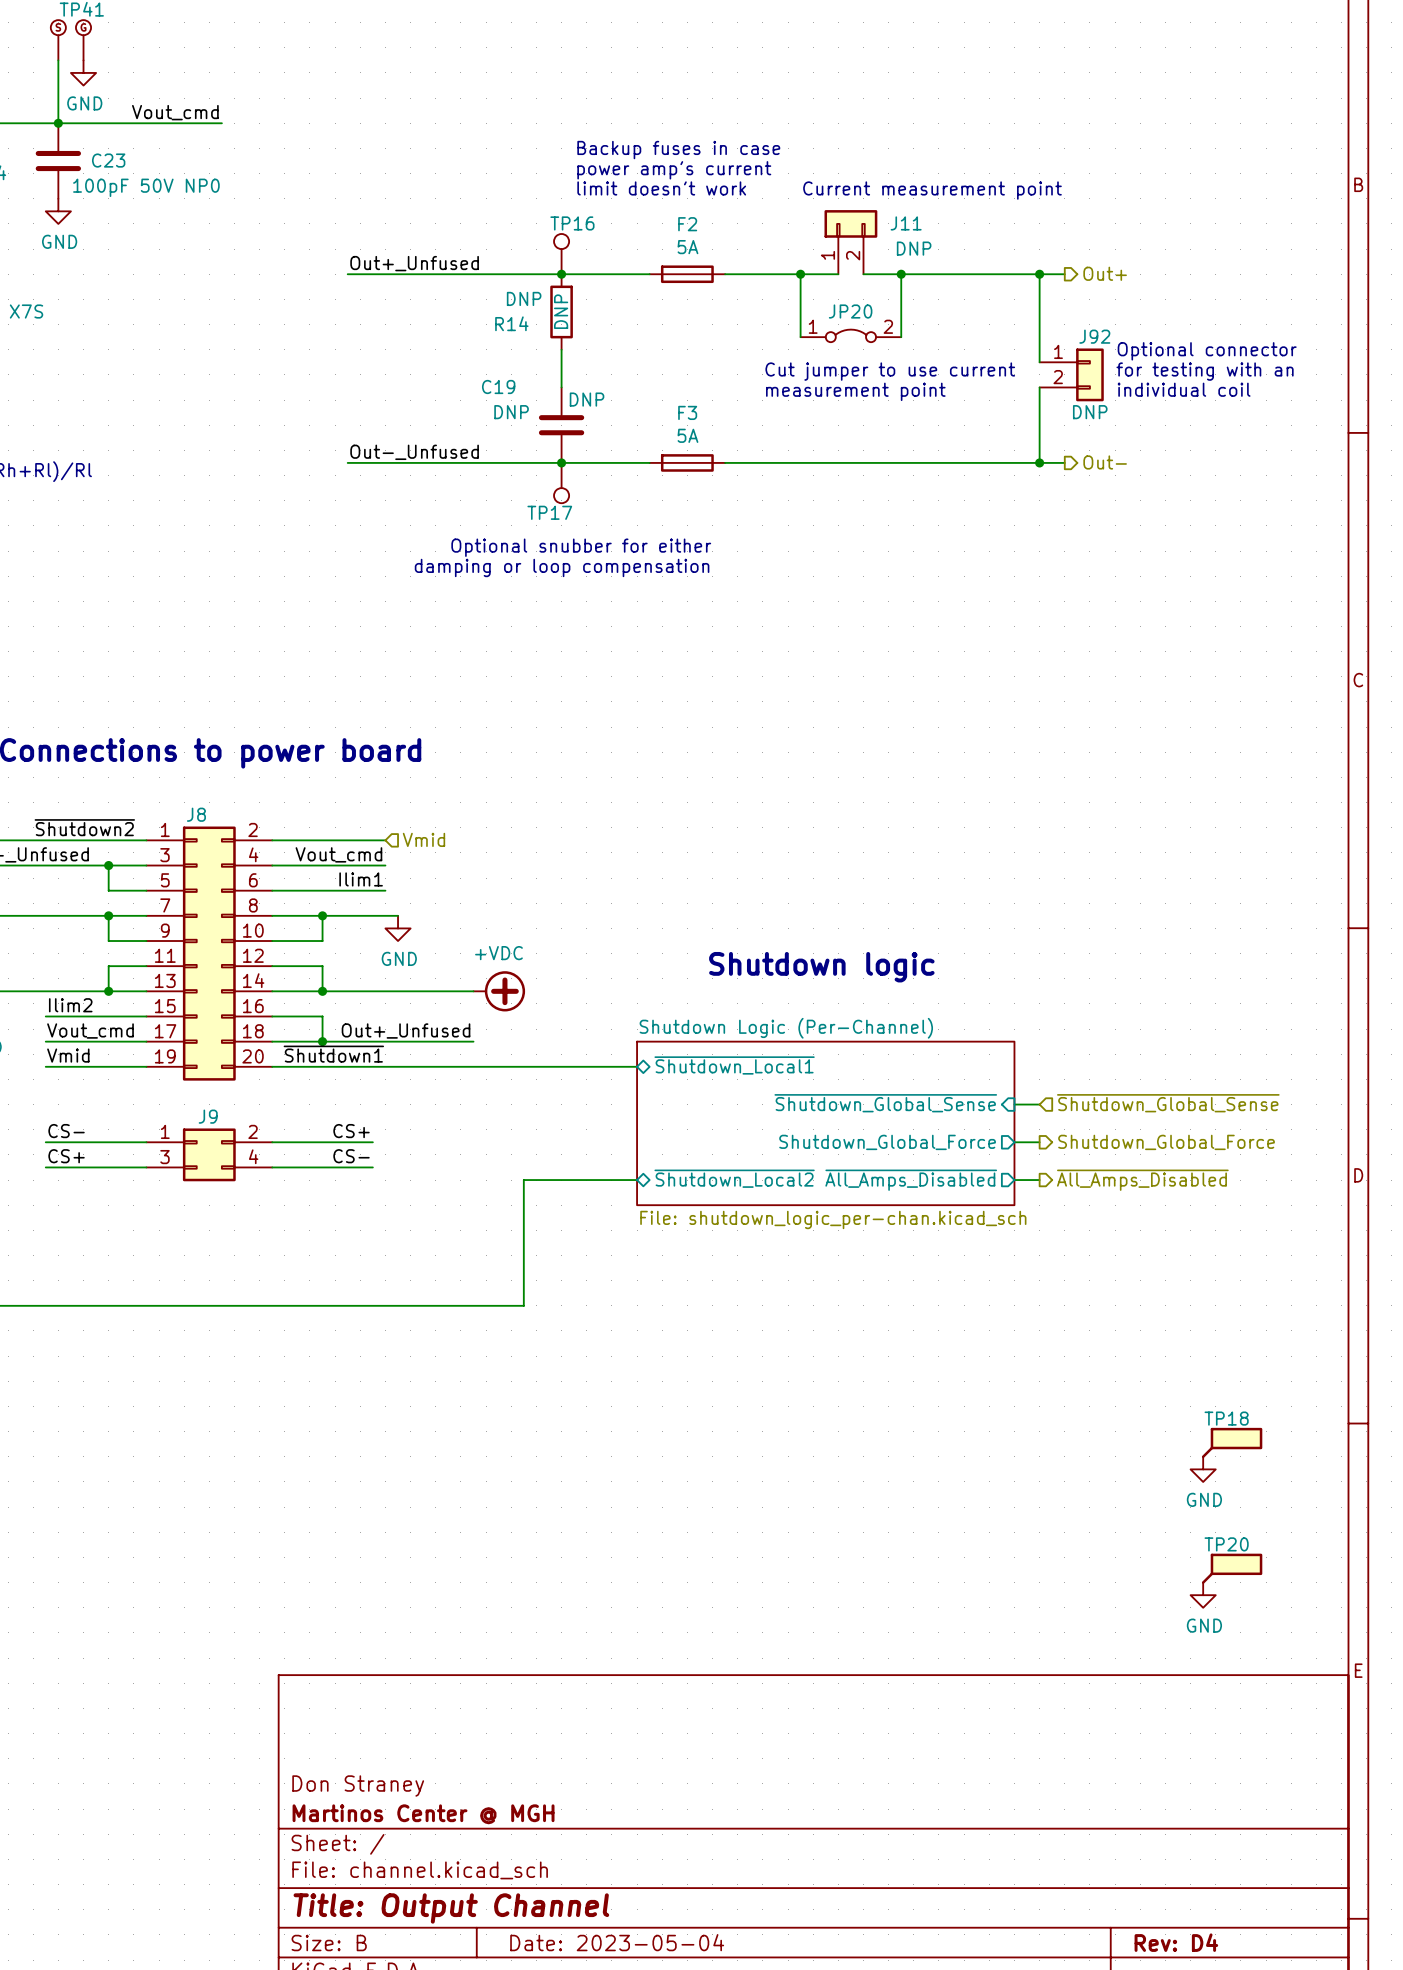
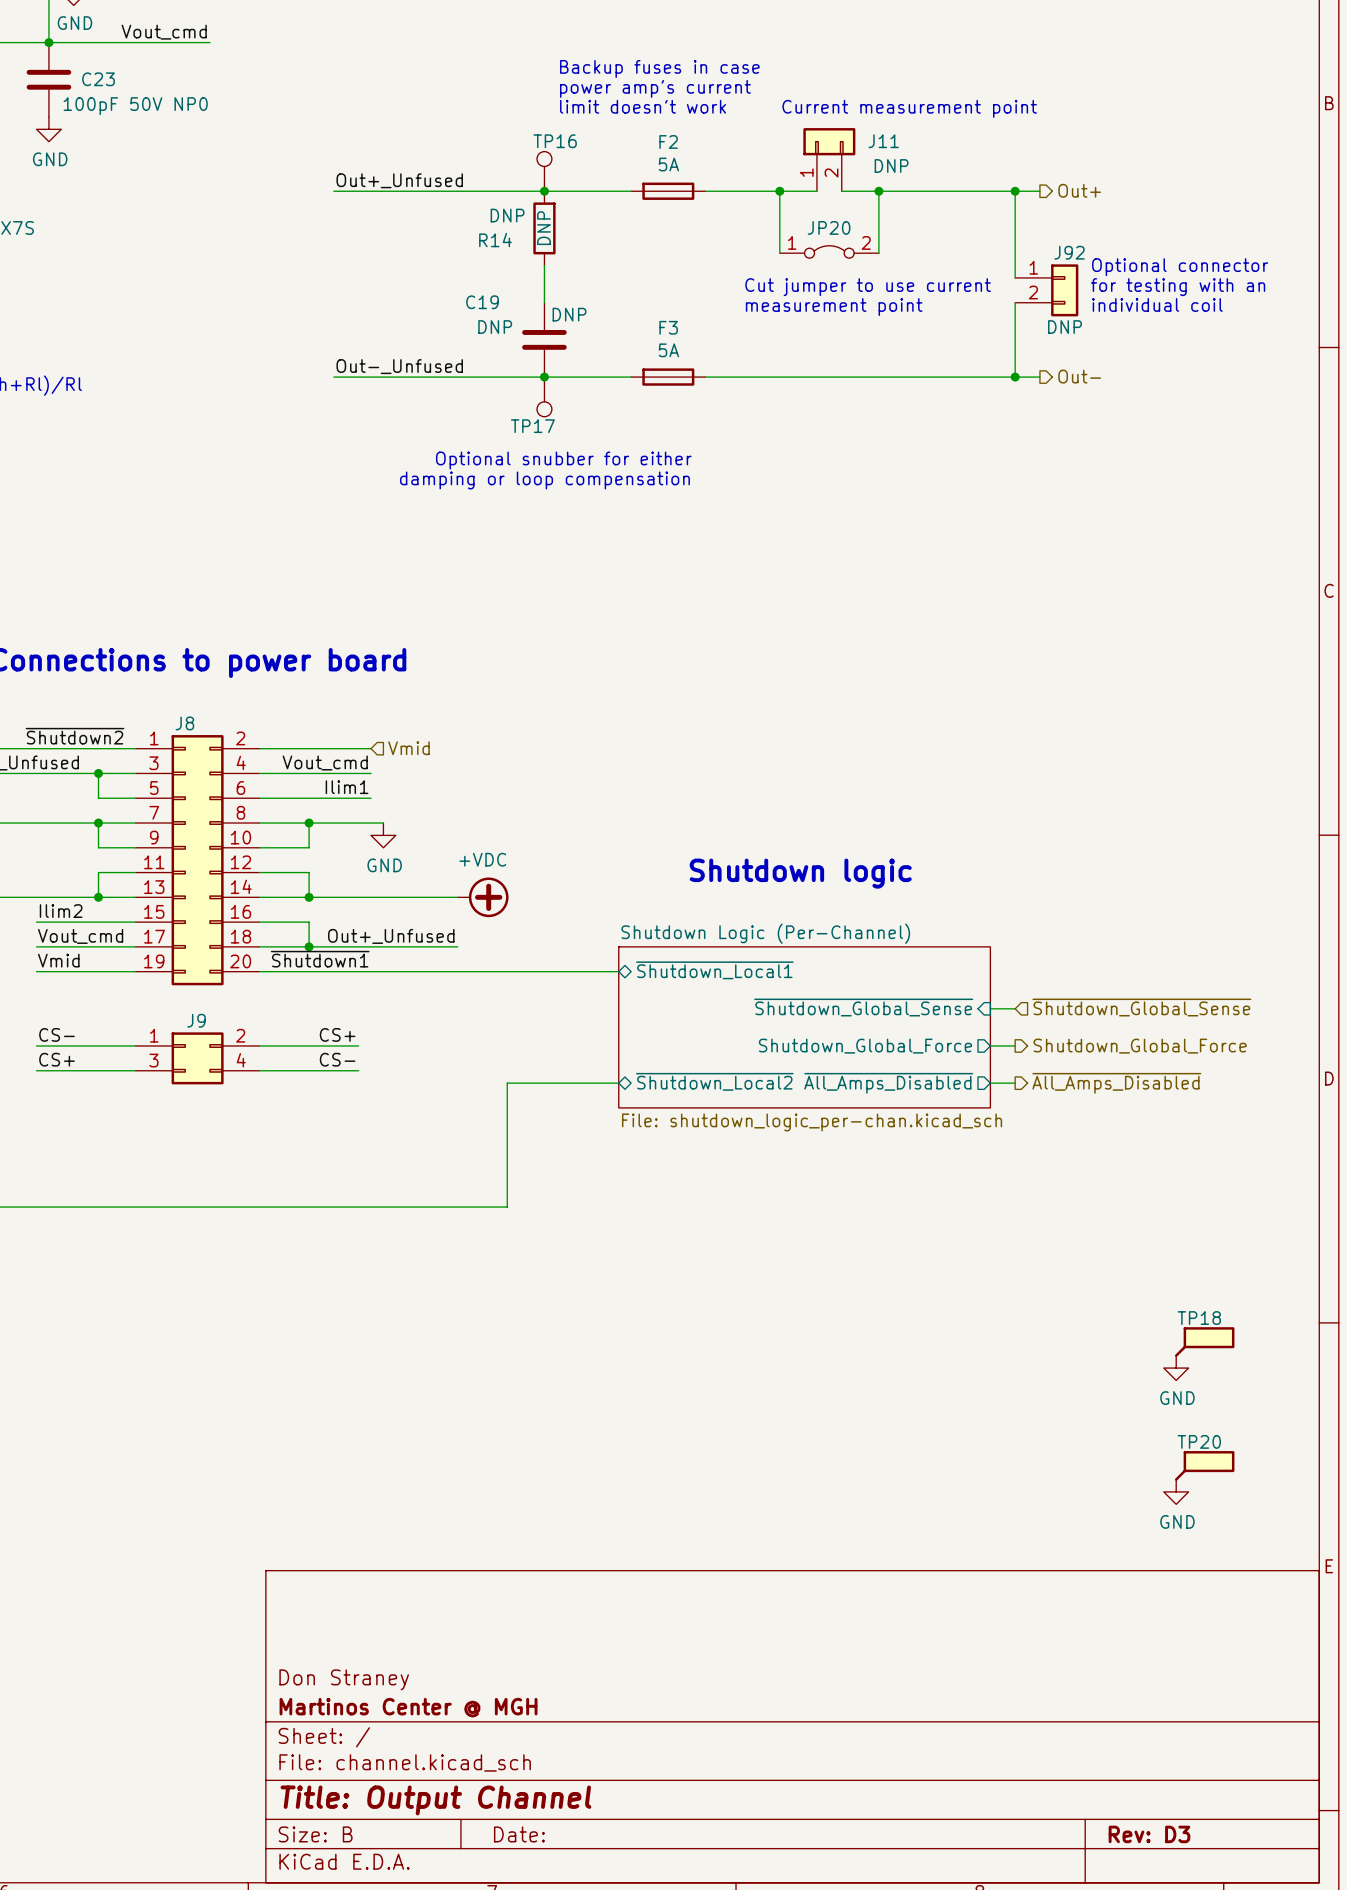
title block: Date: 2023-05-04 (617, 1942) -> Date: (519, 1834)
title block: Rev: D4 (1176, 1942) -> Rev: D3 (1149, 1834)

